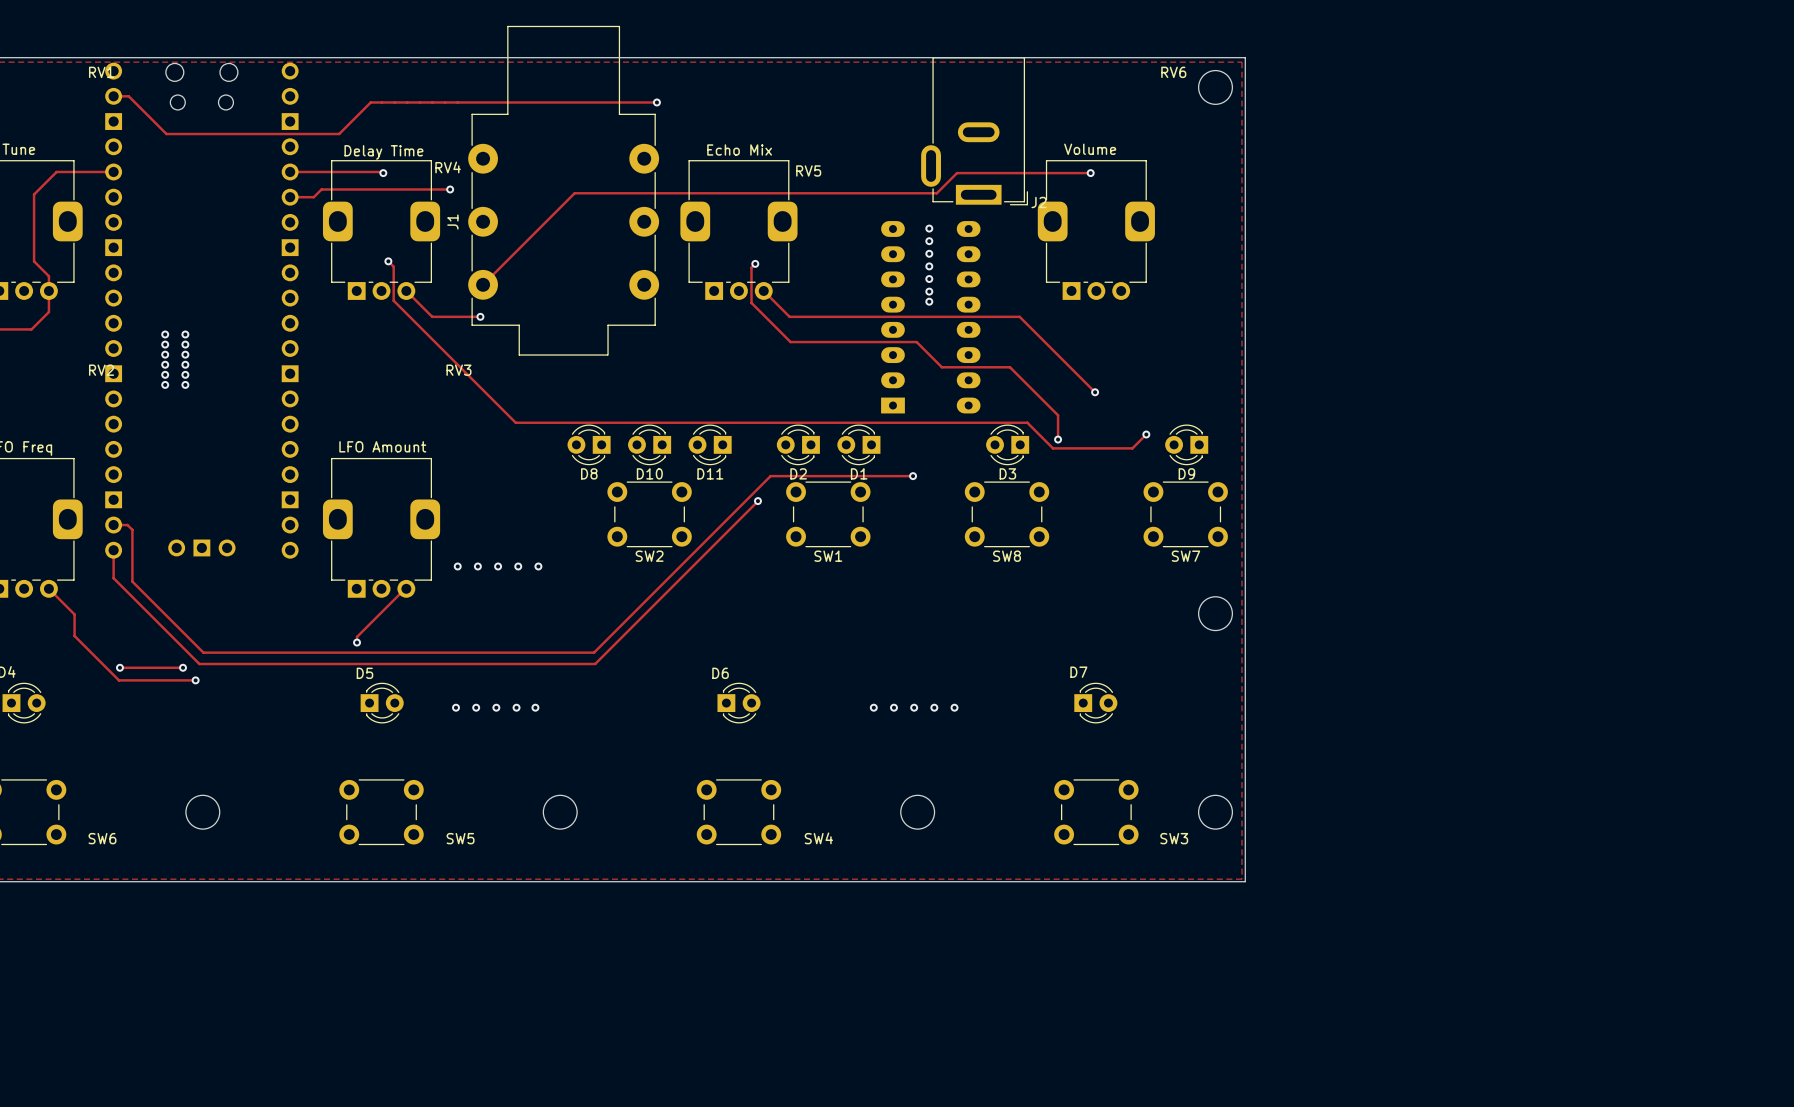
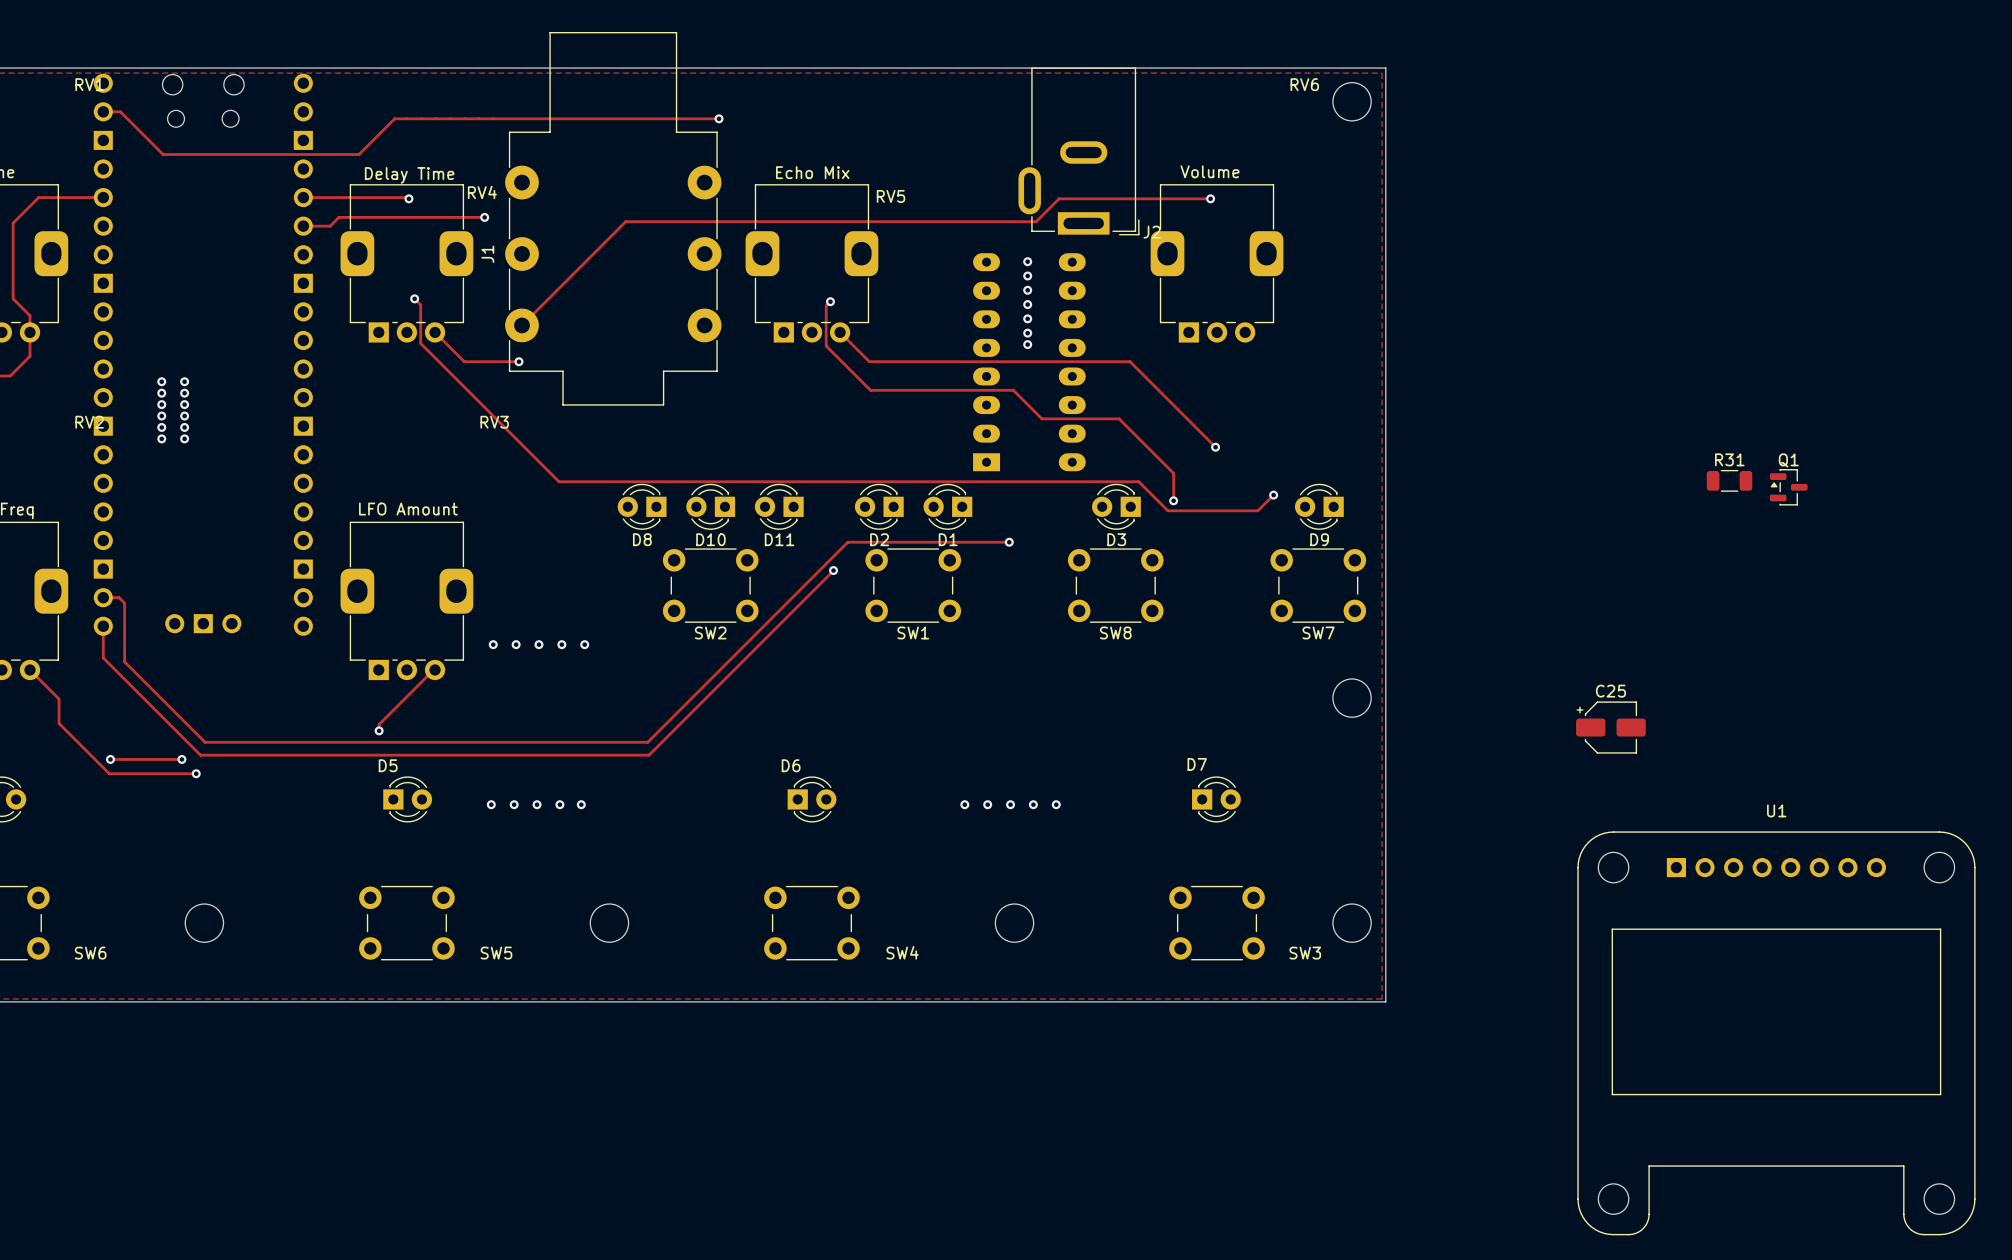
R31: none -> (1729, 480)
Q1: none -> (1788, 487)
C25: none -> (1610, 727)
U1: none -> (1776, 1033)

